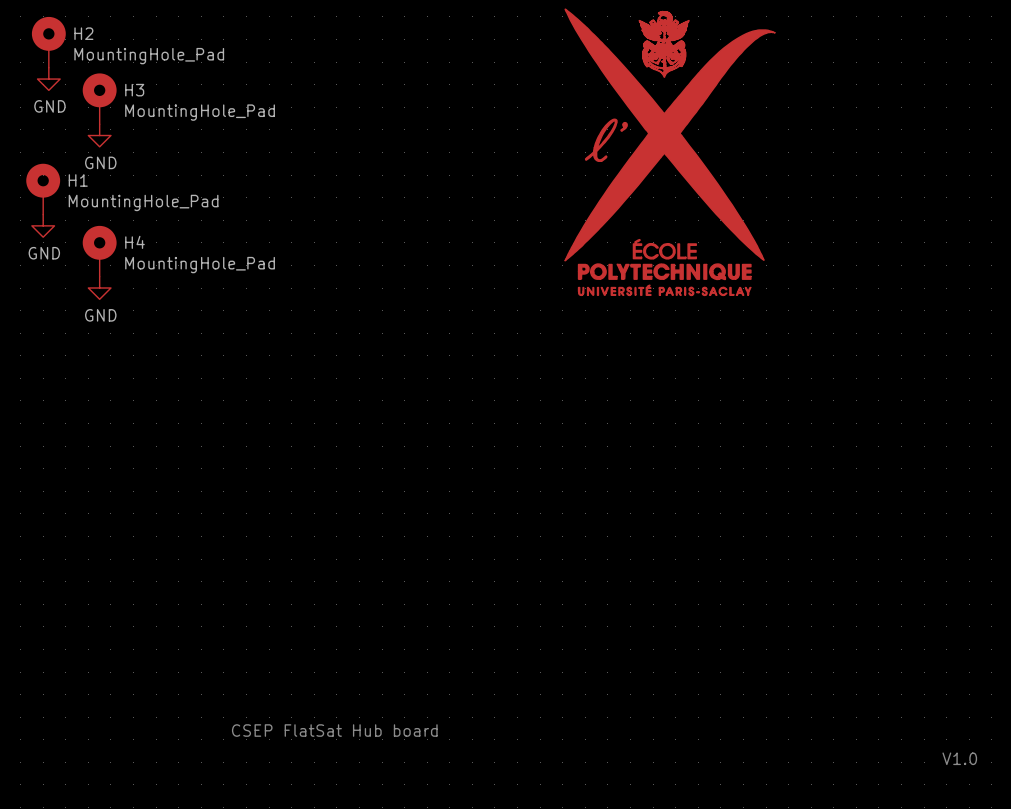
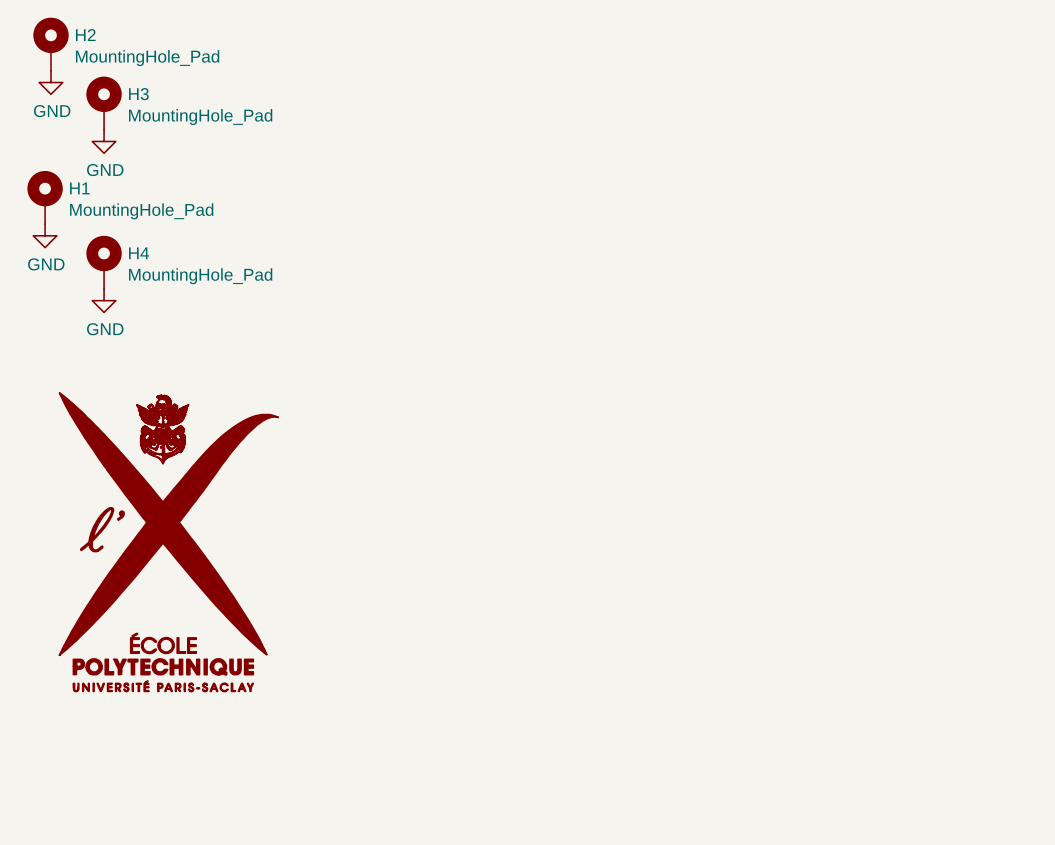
power symbol: (669, 152) -> none
power symbol: none -> (168, 542)
text: CSEP FlatSat Hub board (334, 730) -> none
text: V1.0 (959, 758) -> none

